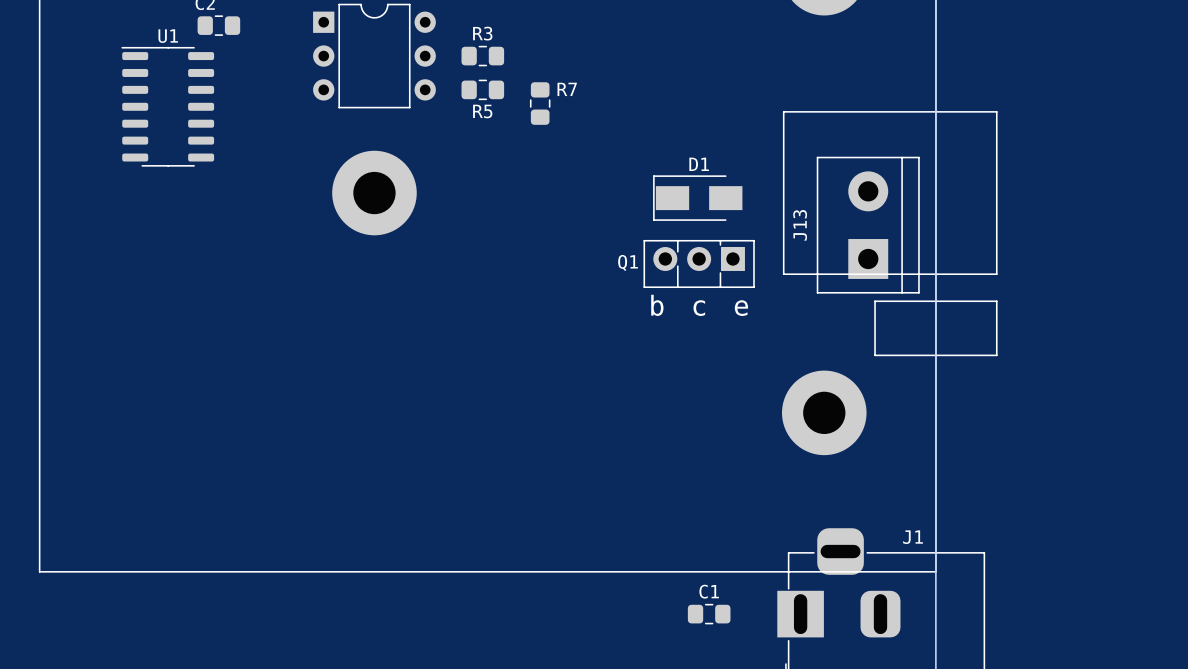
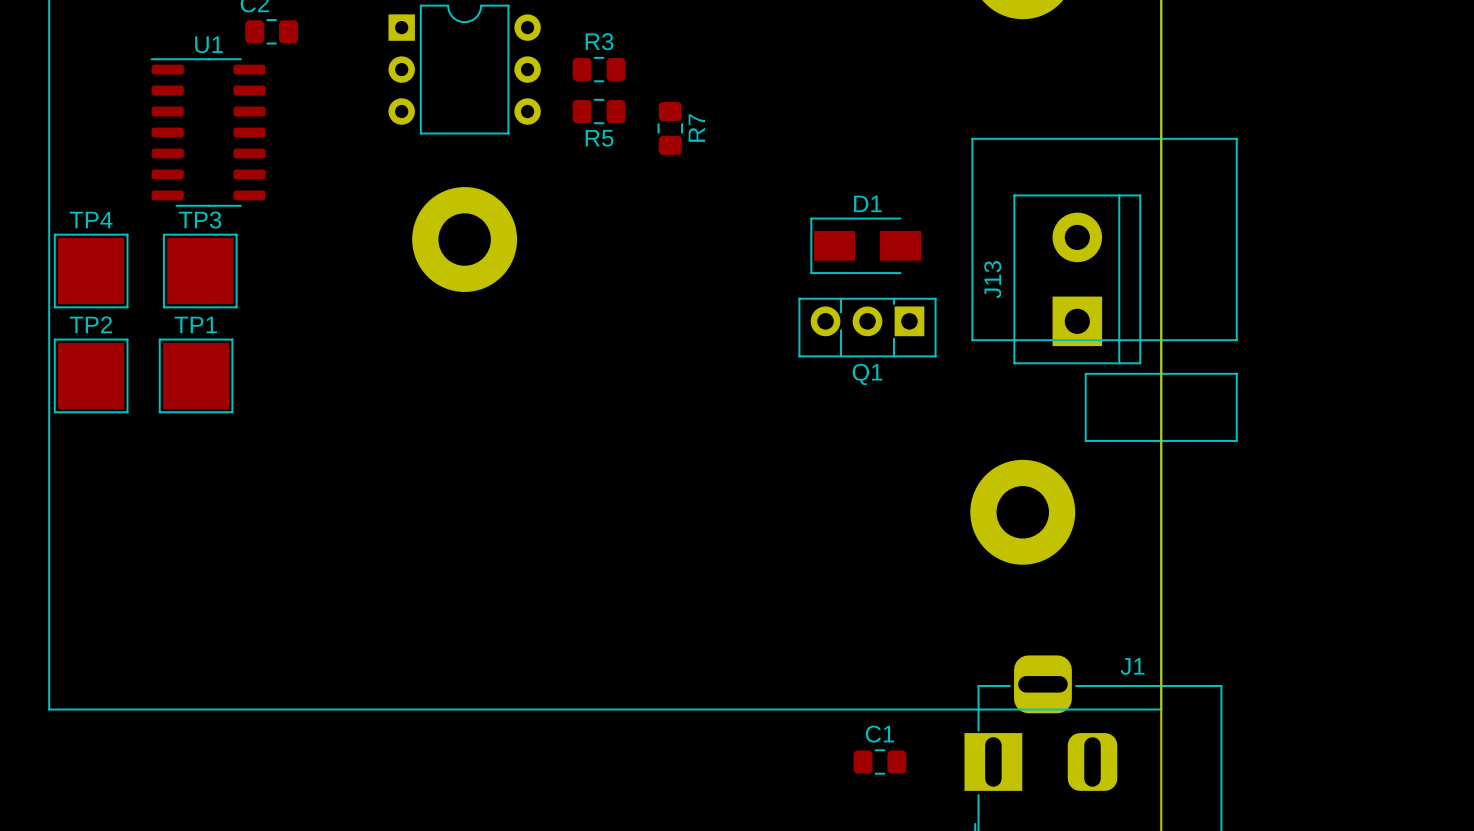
R7 name rotation: 0° (567, 89) -> 90° counterclockwise (696, 128)
TP4: none -> (91, 270)
TP3: none -> (200, 270)
Q1 name position: Q1 (628, 262) -> Q1 (867, 374)
TP2: none -> (91, 375)
TP1: none -> (196, 375)
text: b (657, 305) -> none
text: c (699, 308) -> none
text: e (741, 308) -> none

